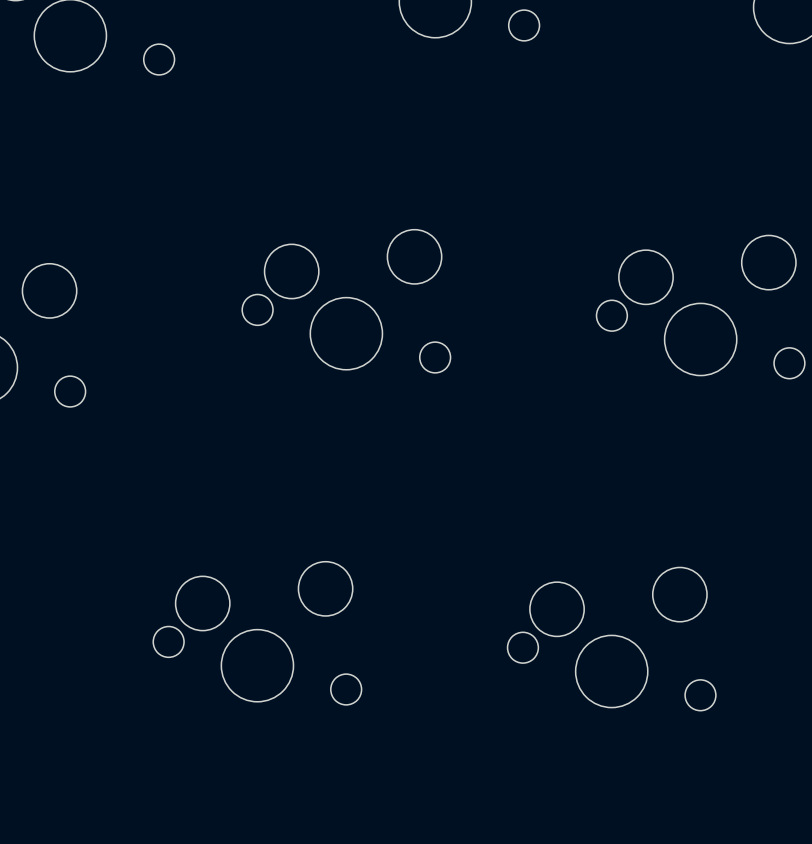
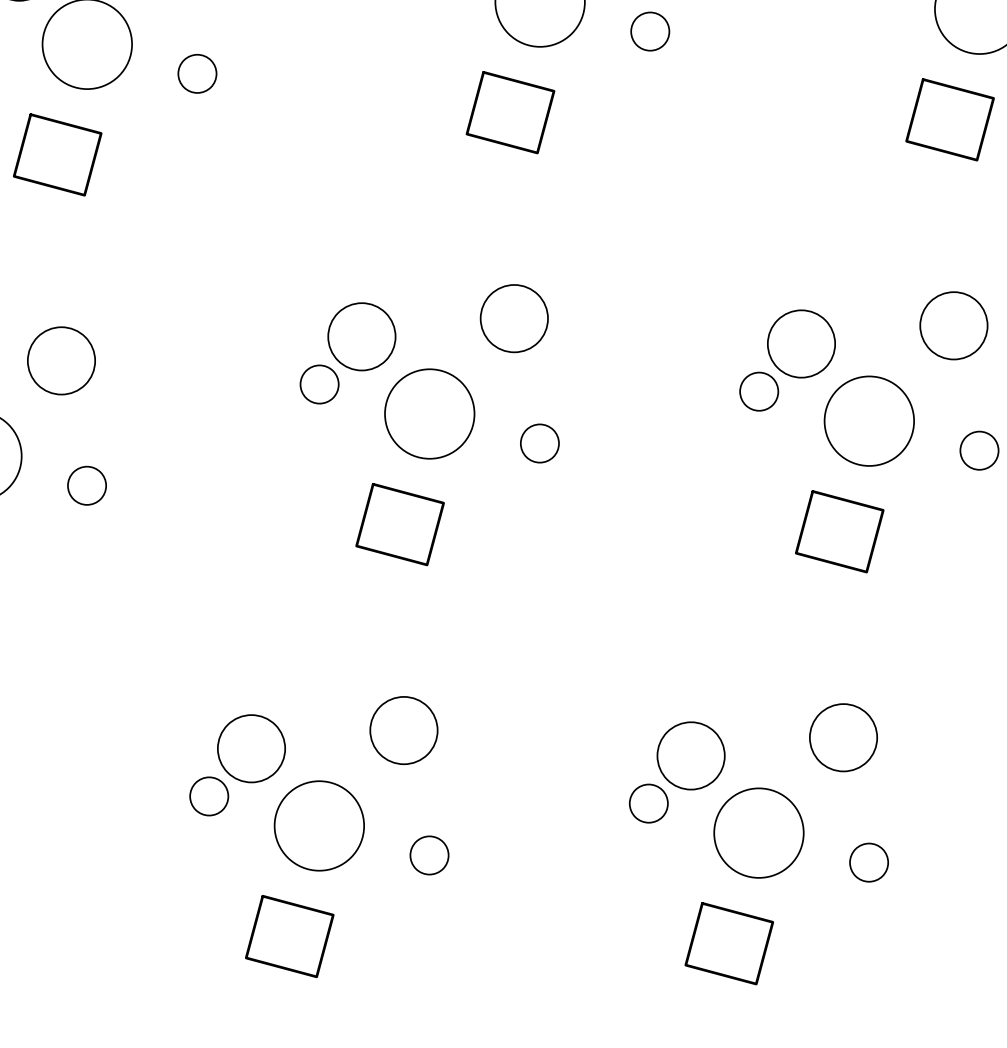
part: none -> (510, 112)
part: none -> (950, 119)
part: none -> (57, 154)
part: none -> (400, 524)
part: none -> (839, 531)
part: none -> (289, 936)
part: none -> (729, 943)

